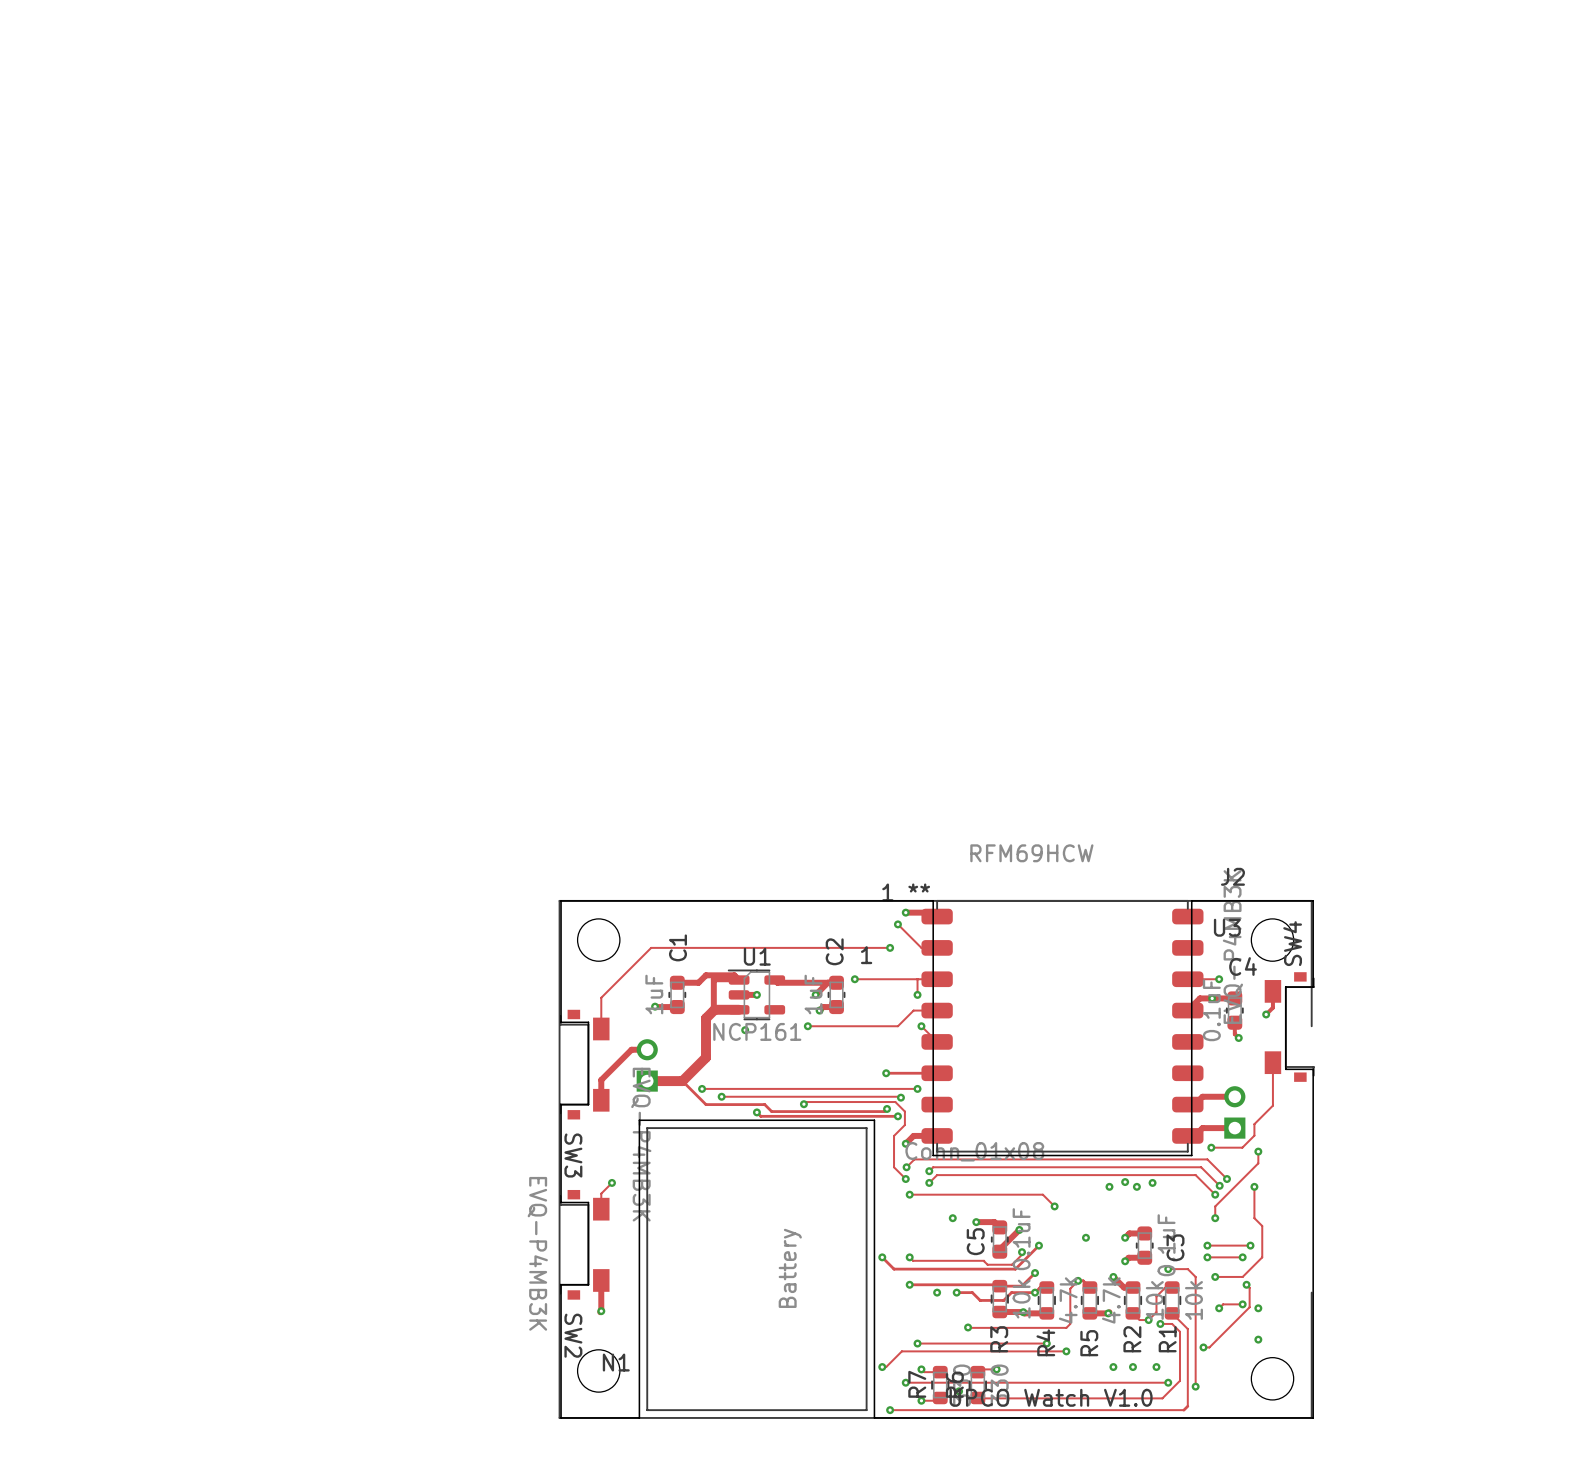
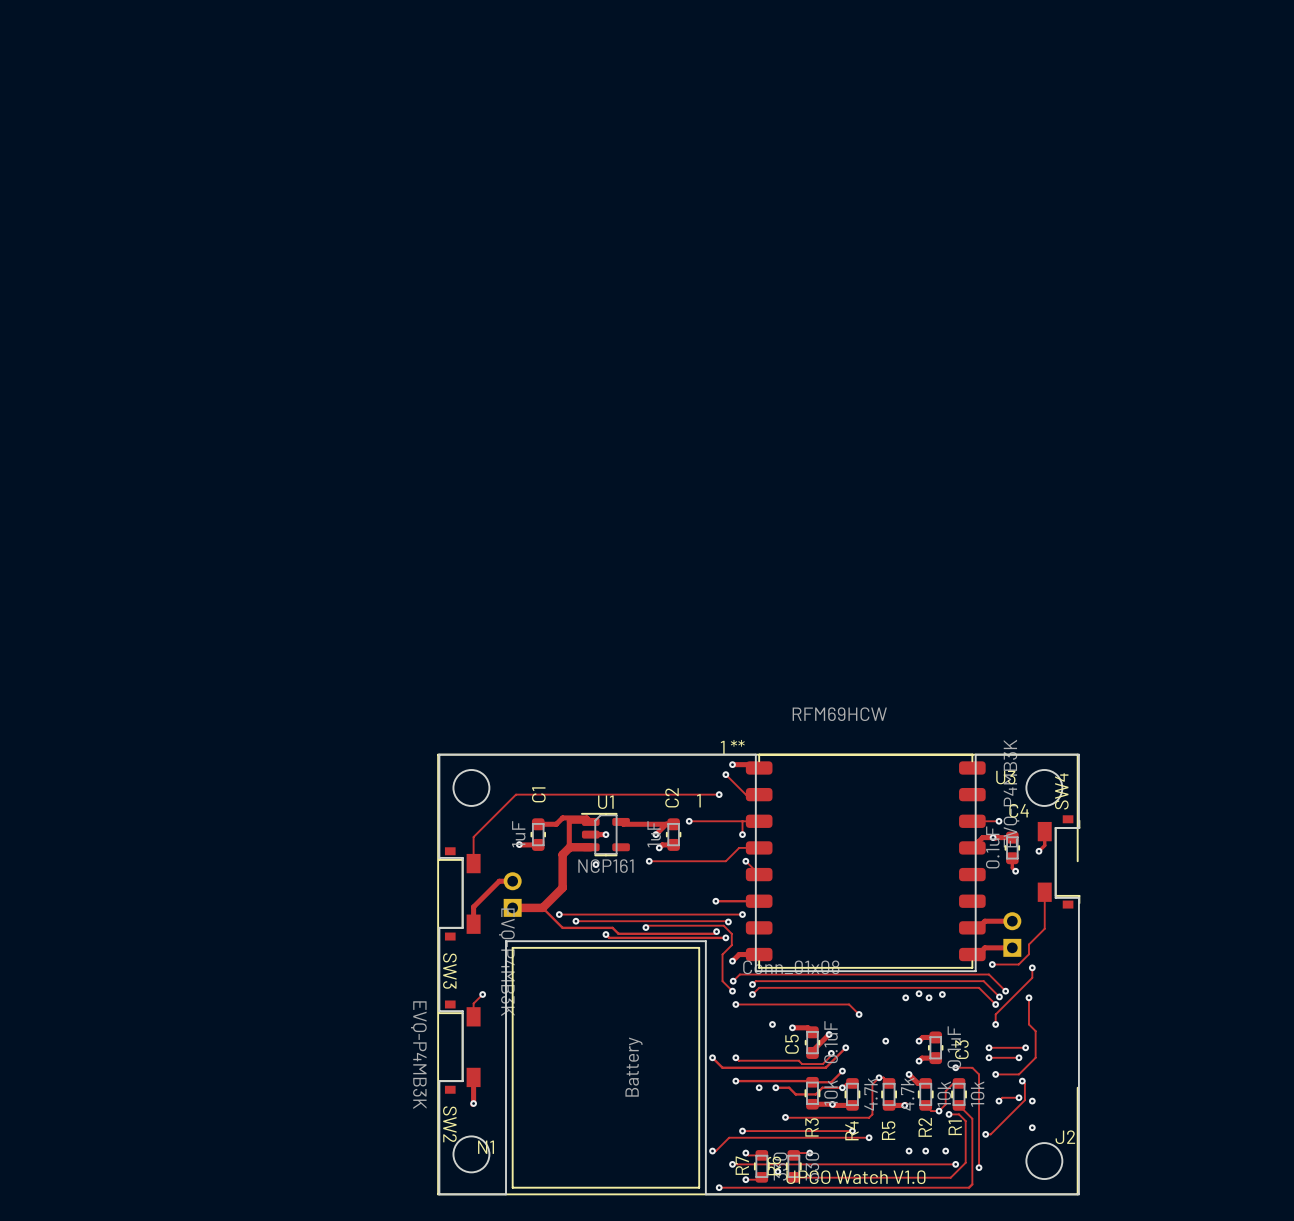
J2 name position: J2 (1232, 876) -> J2 (1065, 1137)

